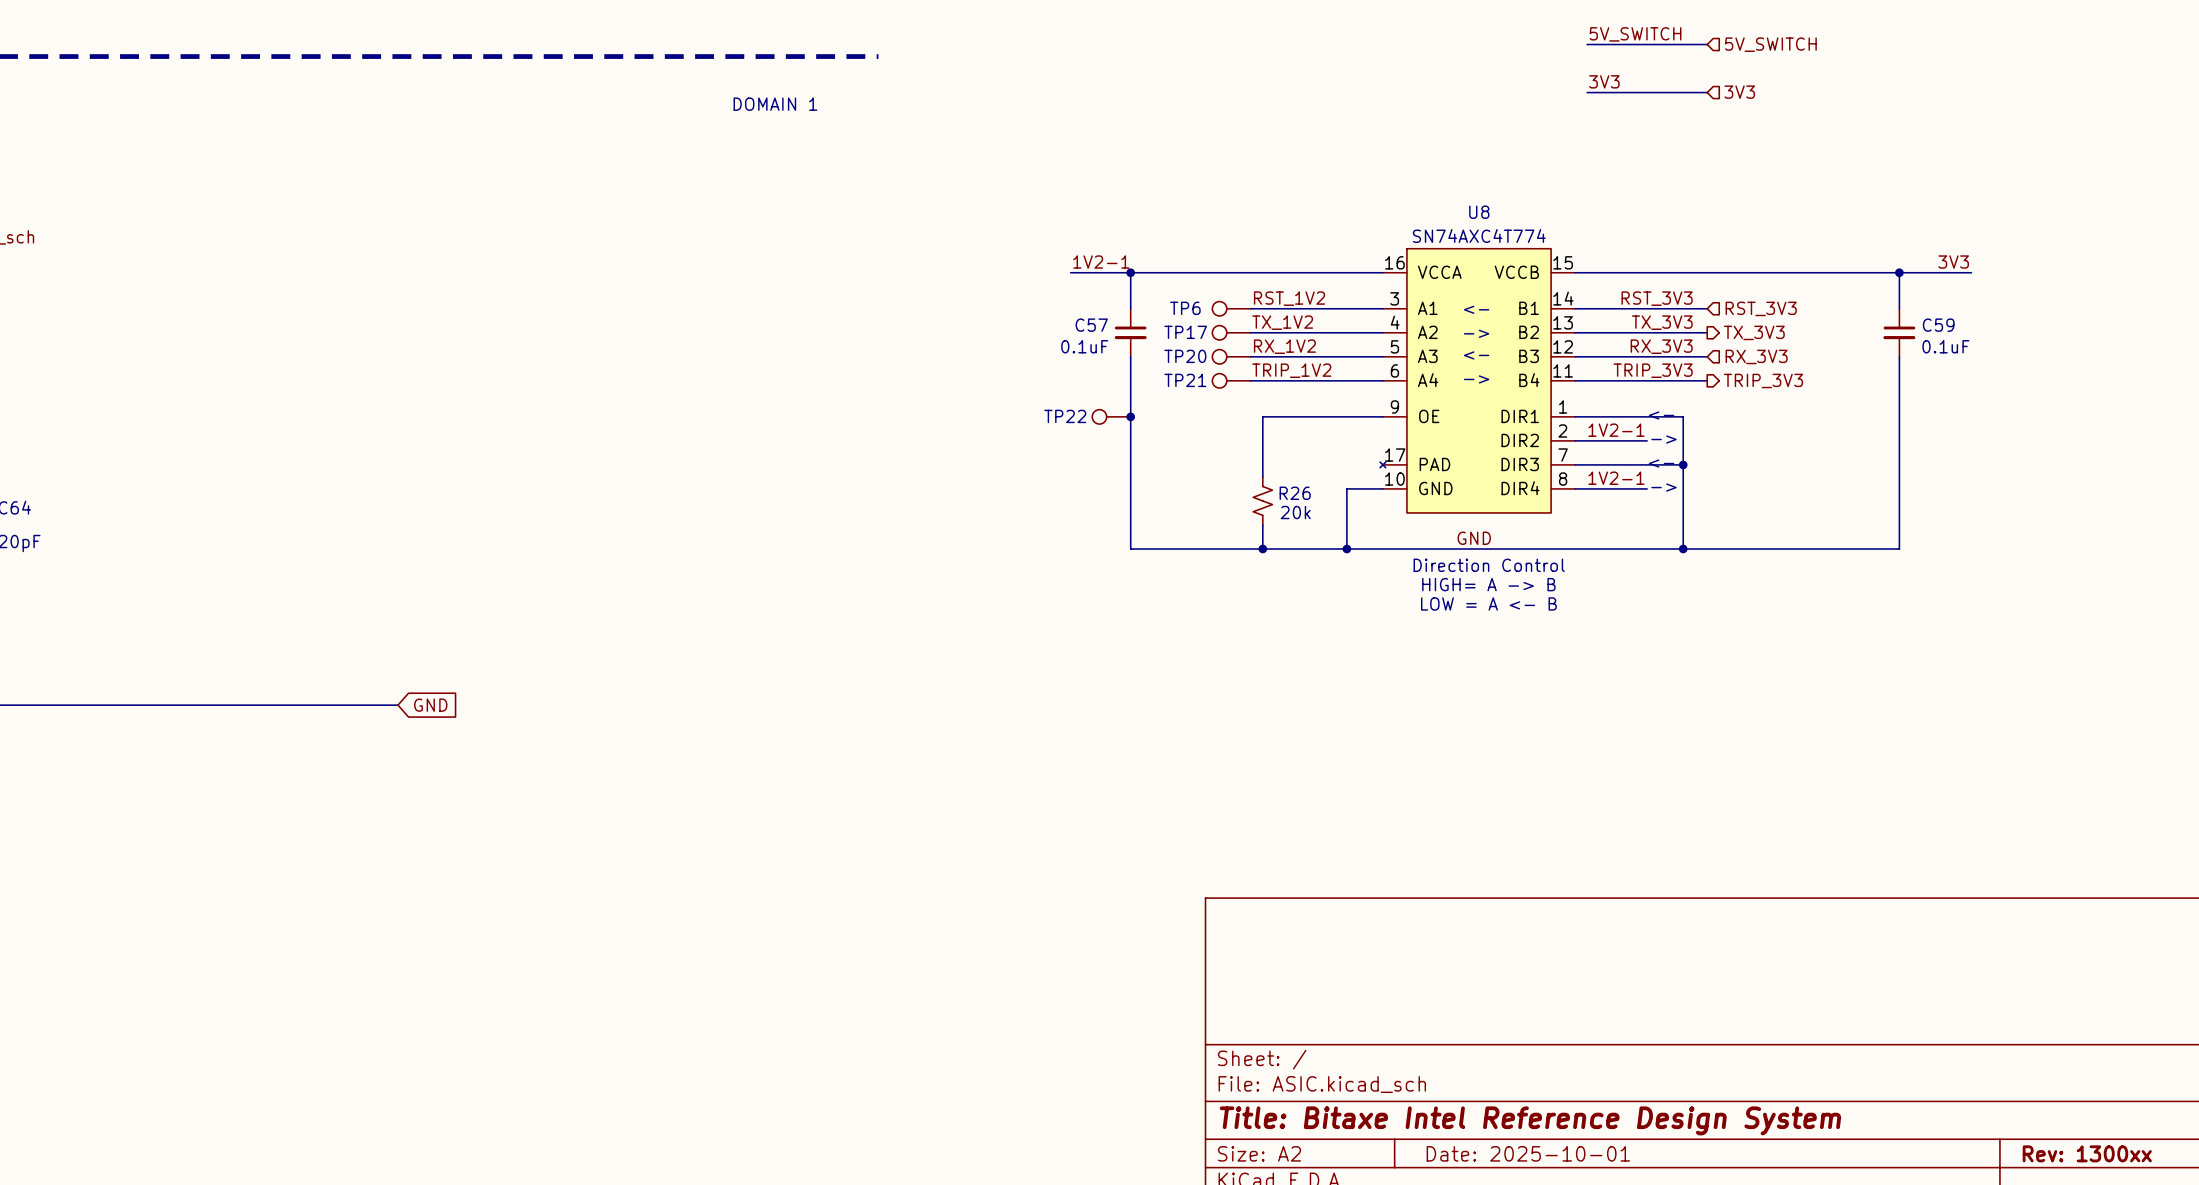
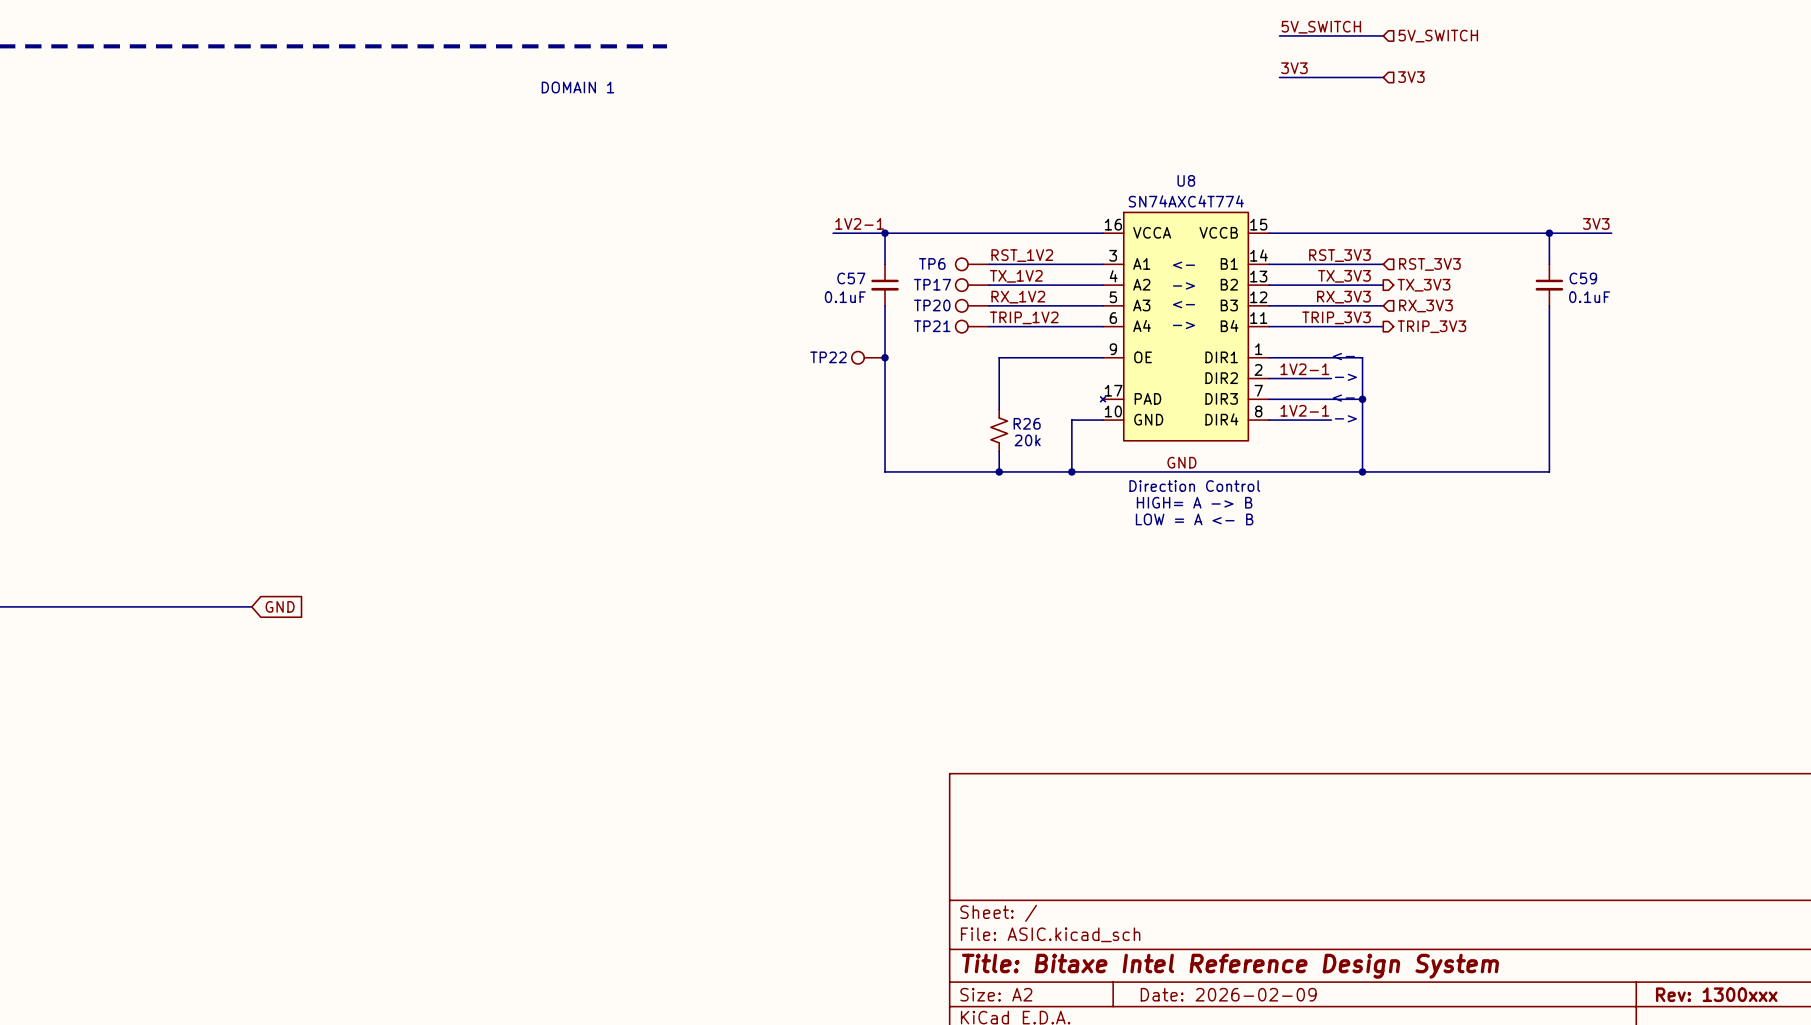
title block: Date: 2025-10-01 (1528, 1153) -> Date: 2026-02-09 (1228, 994)
title block: Rev: 1300xx (2087, 1153) -> Rev: 1300xxx (1716, 994)

